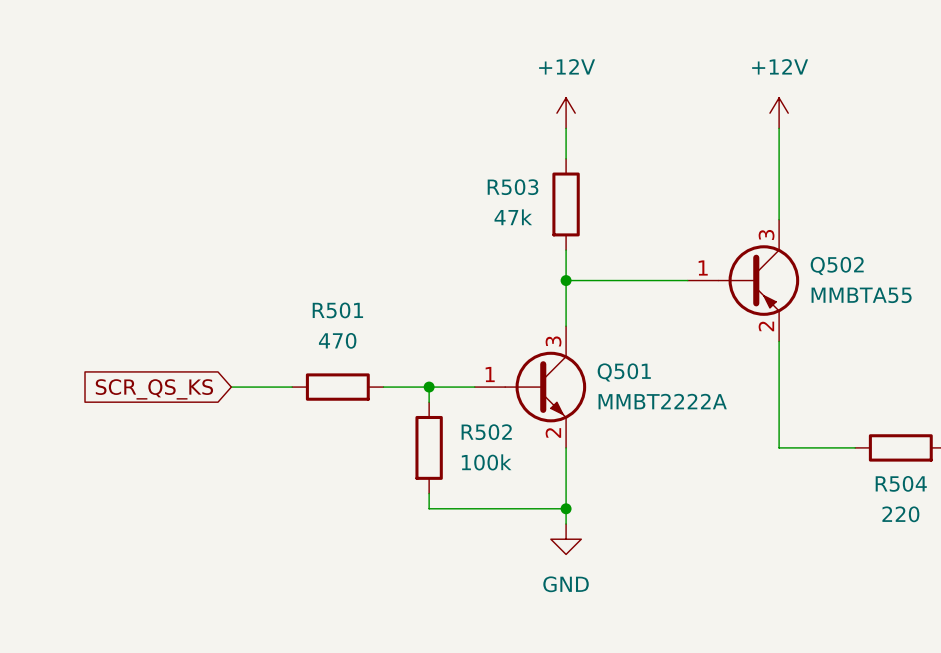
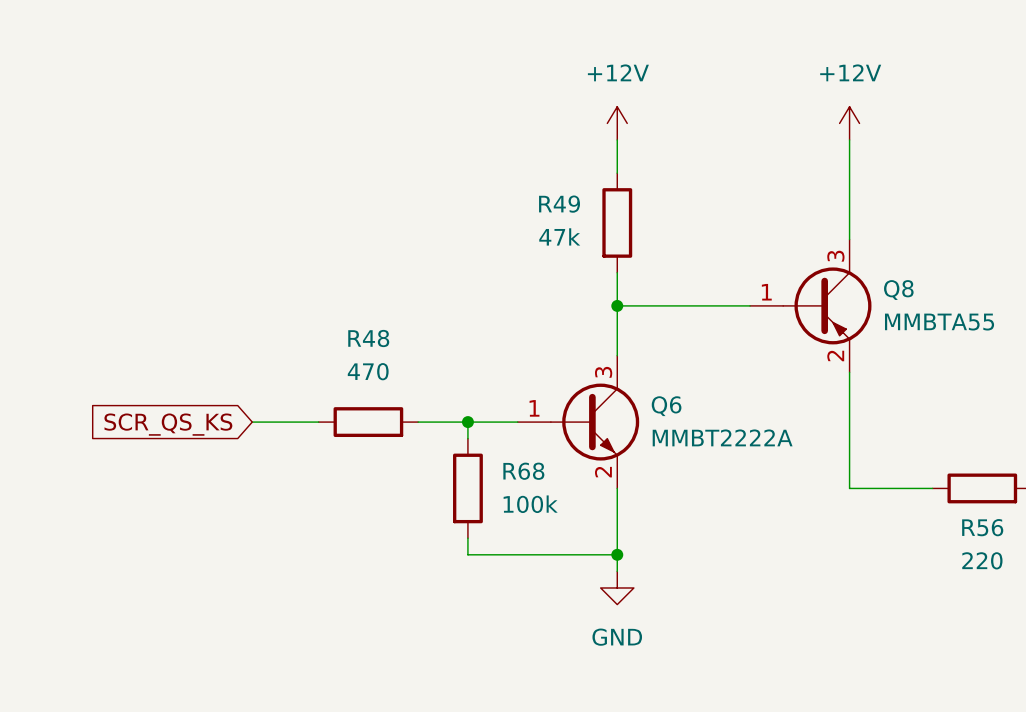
R503 name: R503 (513, 187) -> R49 (559, 204)
Q502 name: Q502 (837, 265) -> Q8 (898, 290)
R501 name: R501 (337, 310) -> R48 (368, 338)
Q501 name: Q501 (624, 372) -> Q6 (666, 406)
R502 name: R502 (486, 432) -> R68 (523, 471)
R504 name: R504 (901, 483) -> R56 (982, 527)

